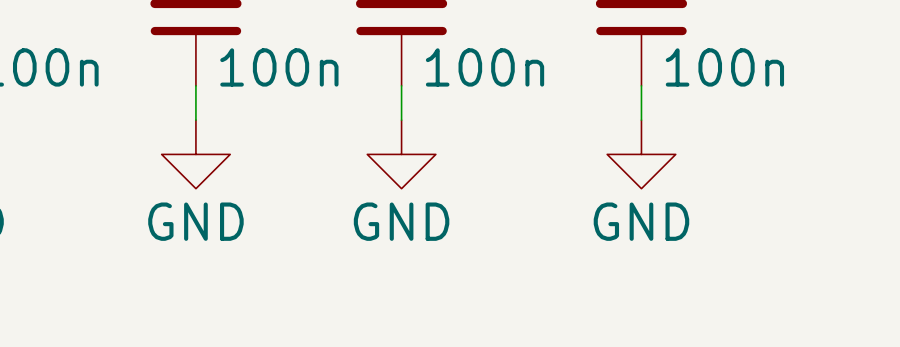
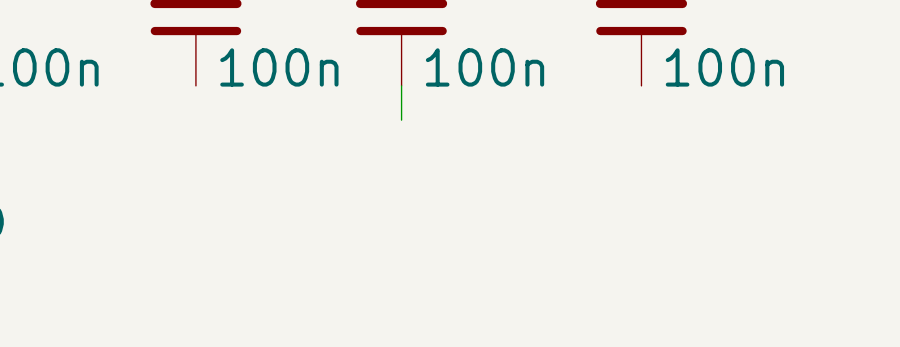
wire: (195, 85) (195, 120) -> none
wire: (641, 85) (641, 120) -> none
power symbol: GND (195, 154) -> none
power symbol: GND (401, 154) -> none
power symbol: GND (641, 154) -> none

